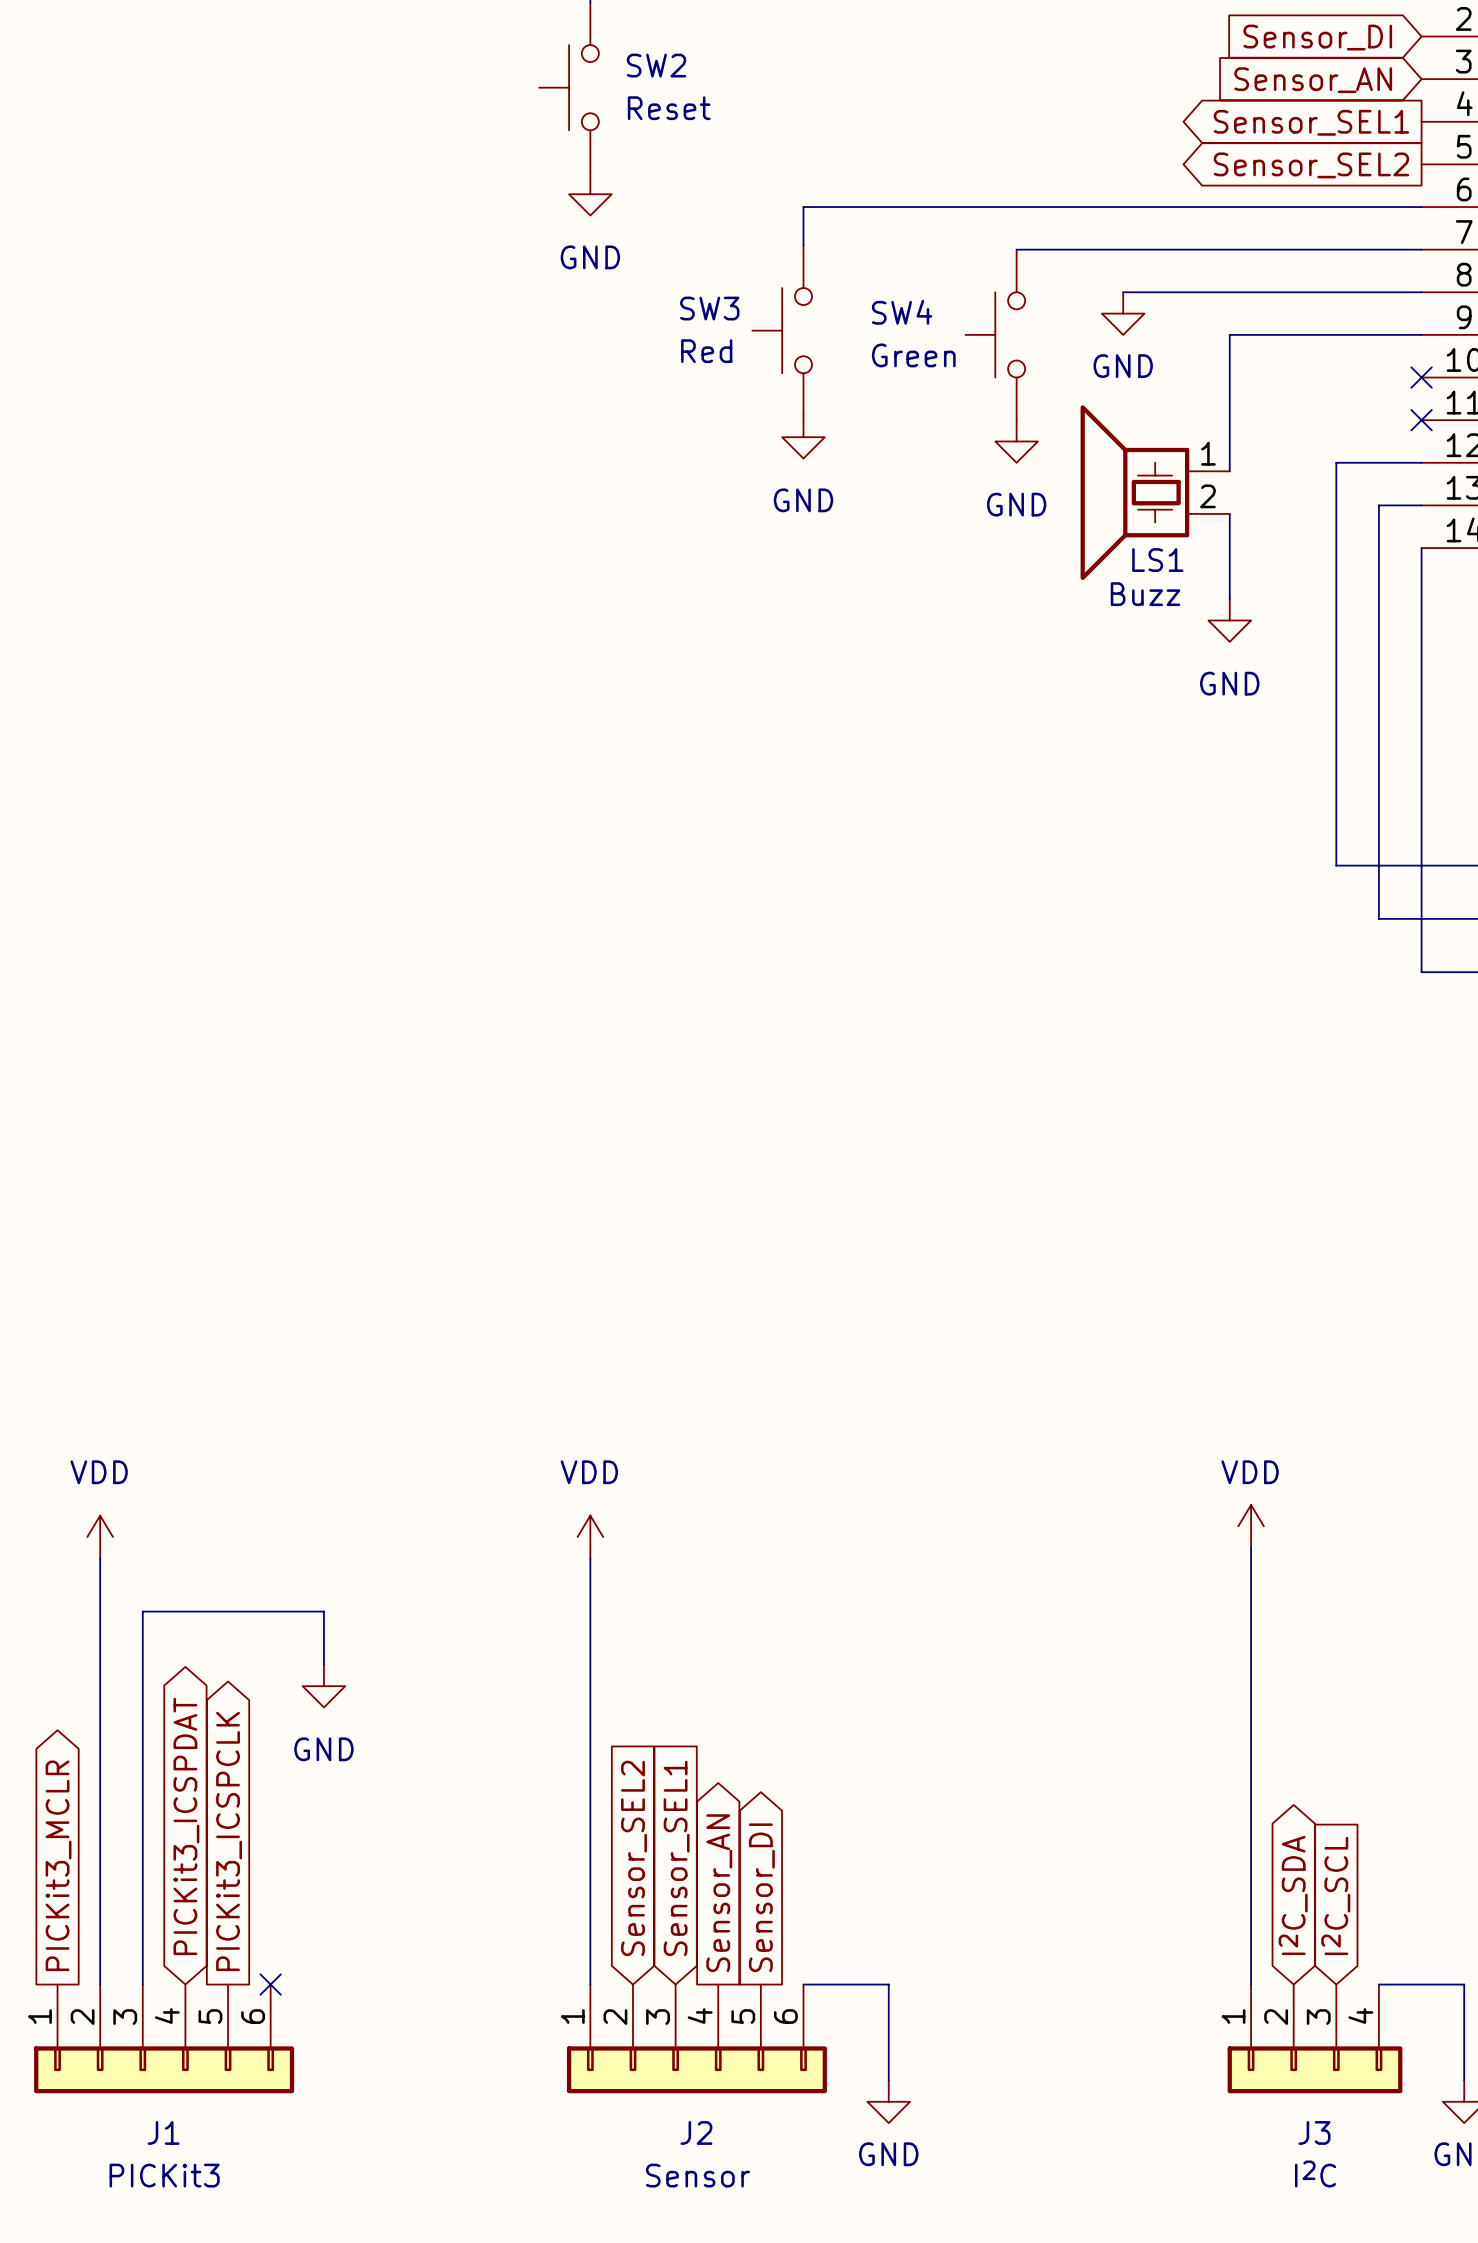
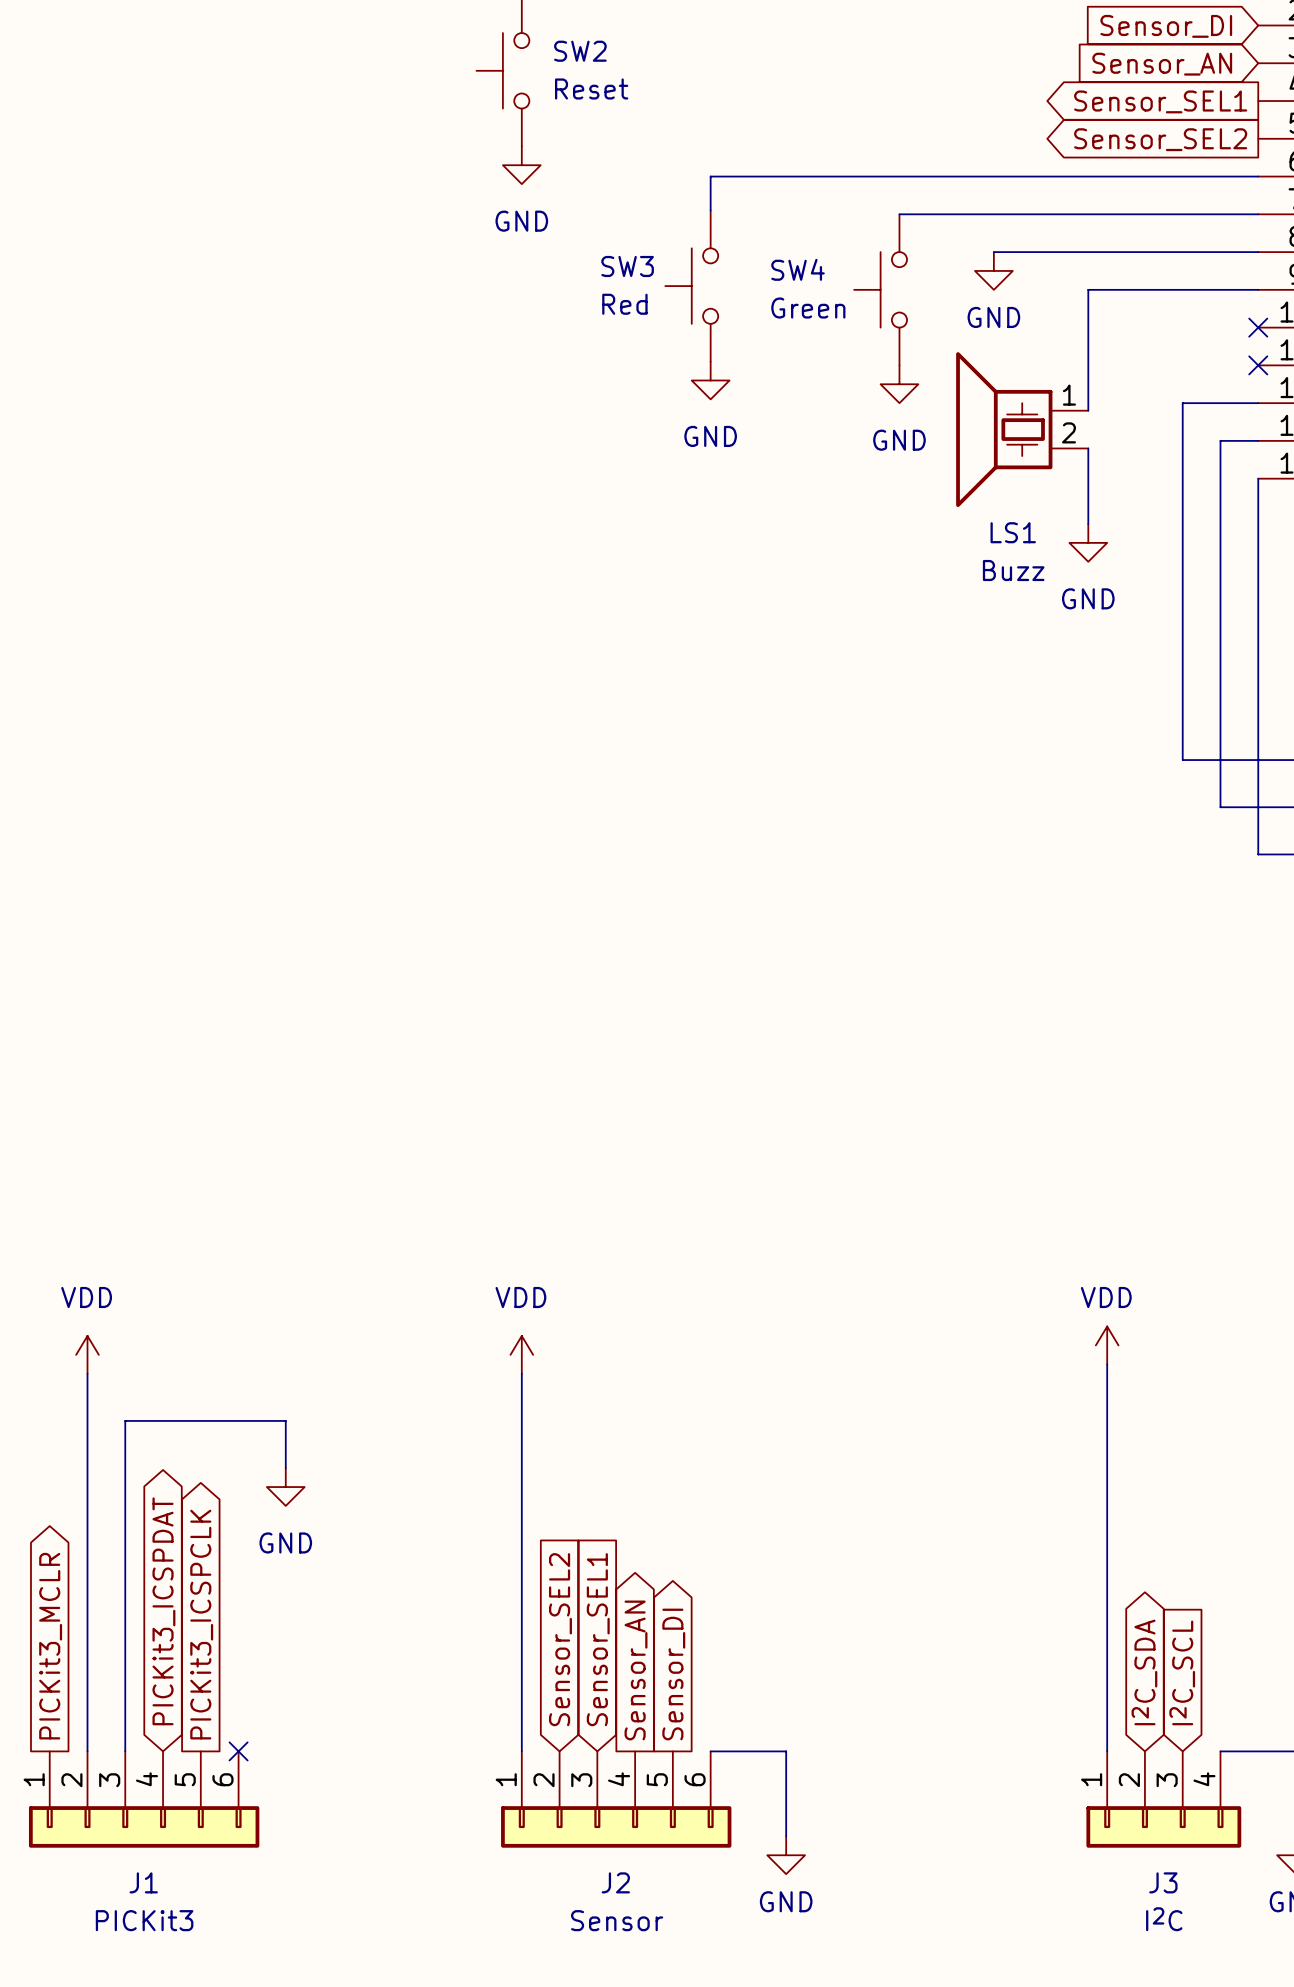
LS1 name position: LS1 (1157, 560) -> LS1 (1013, 532)
LS1 value position: Buzz (1145, 594) -> Buzz (1013, 570)

